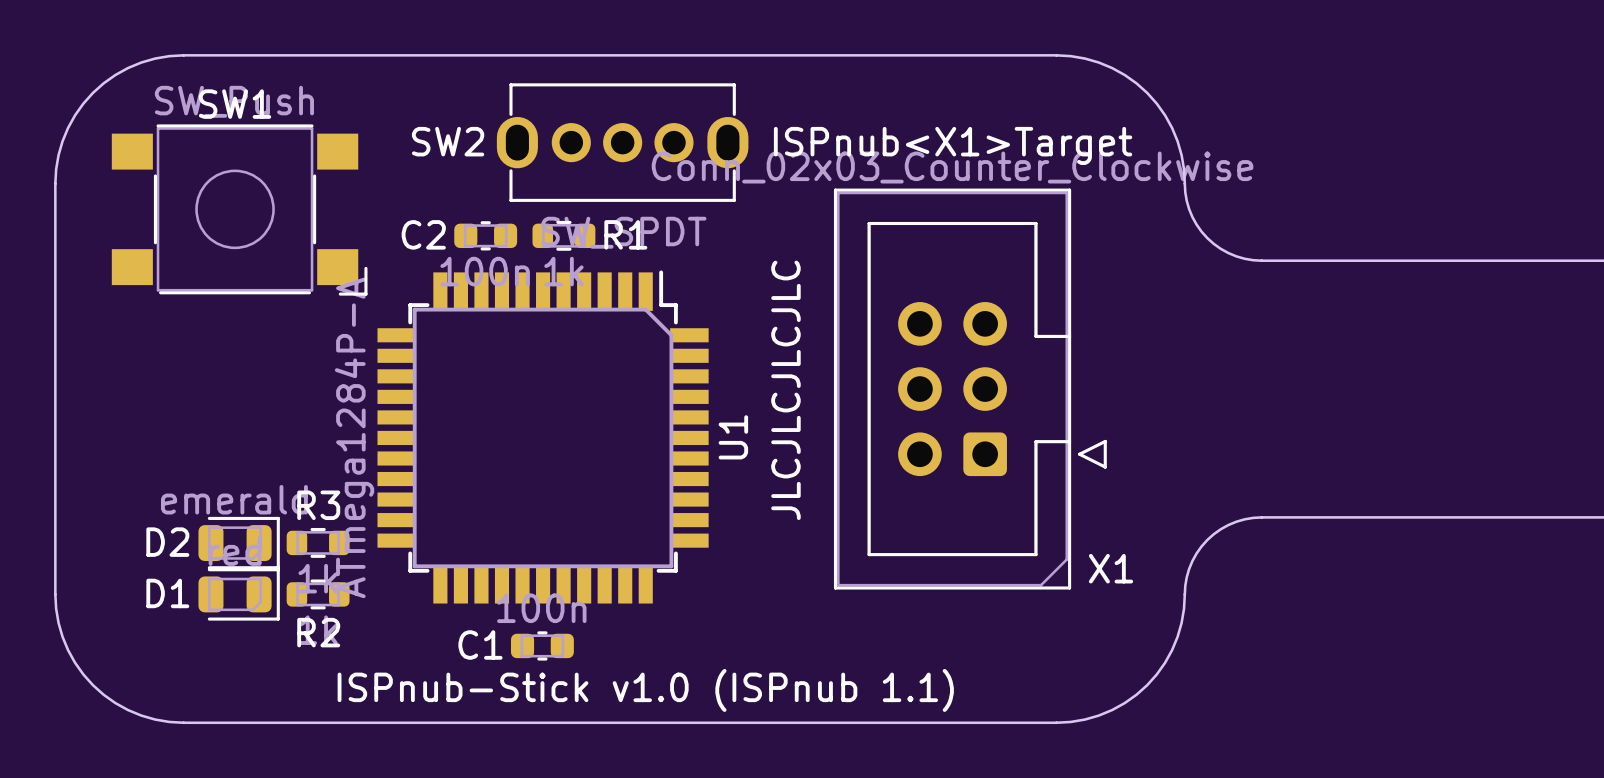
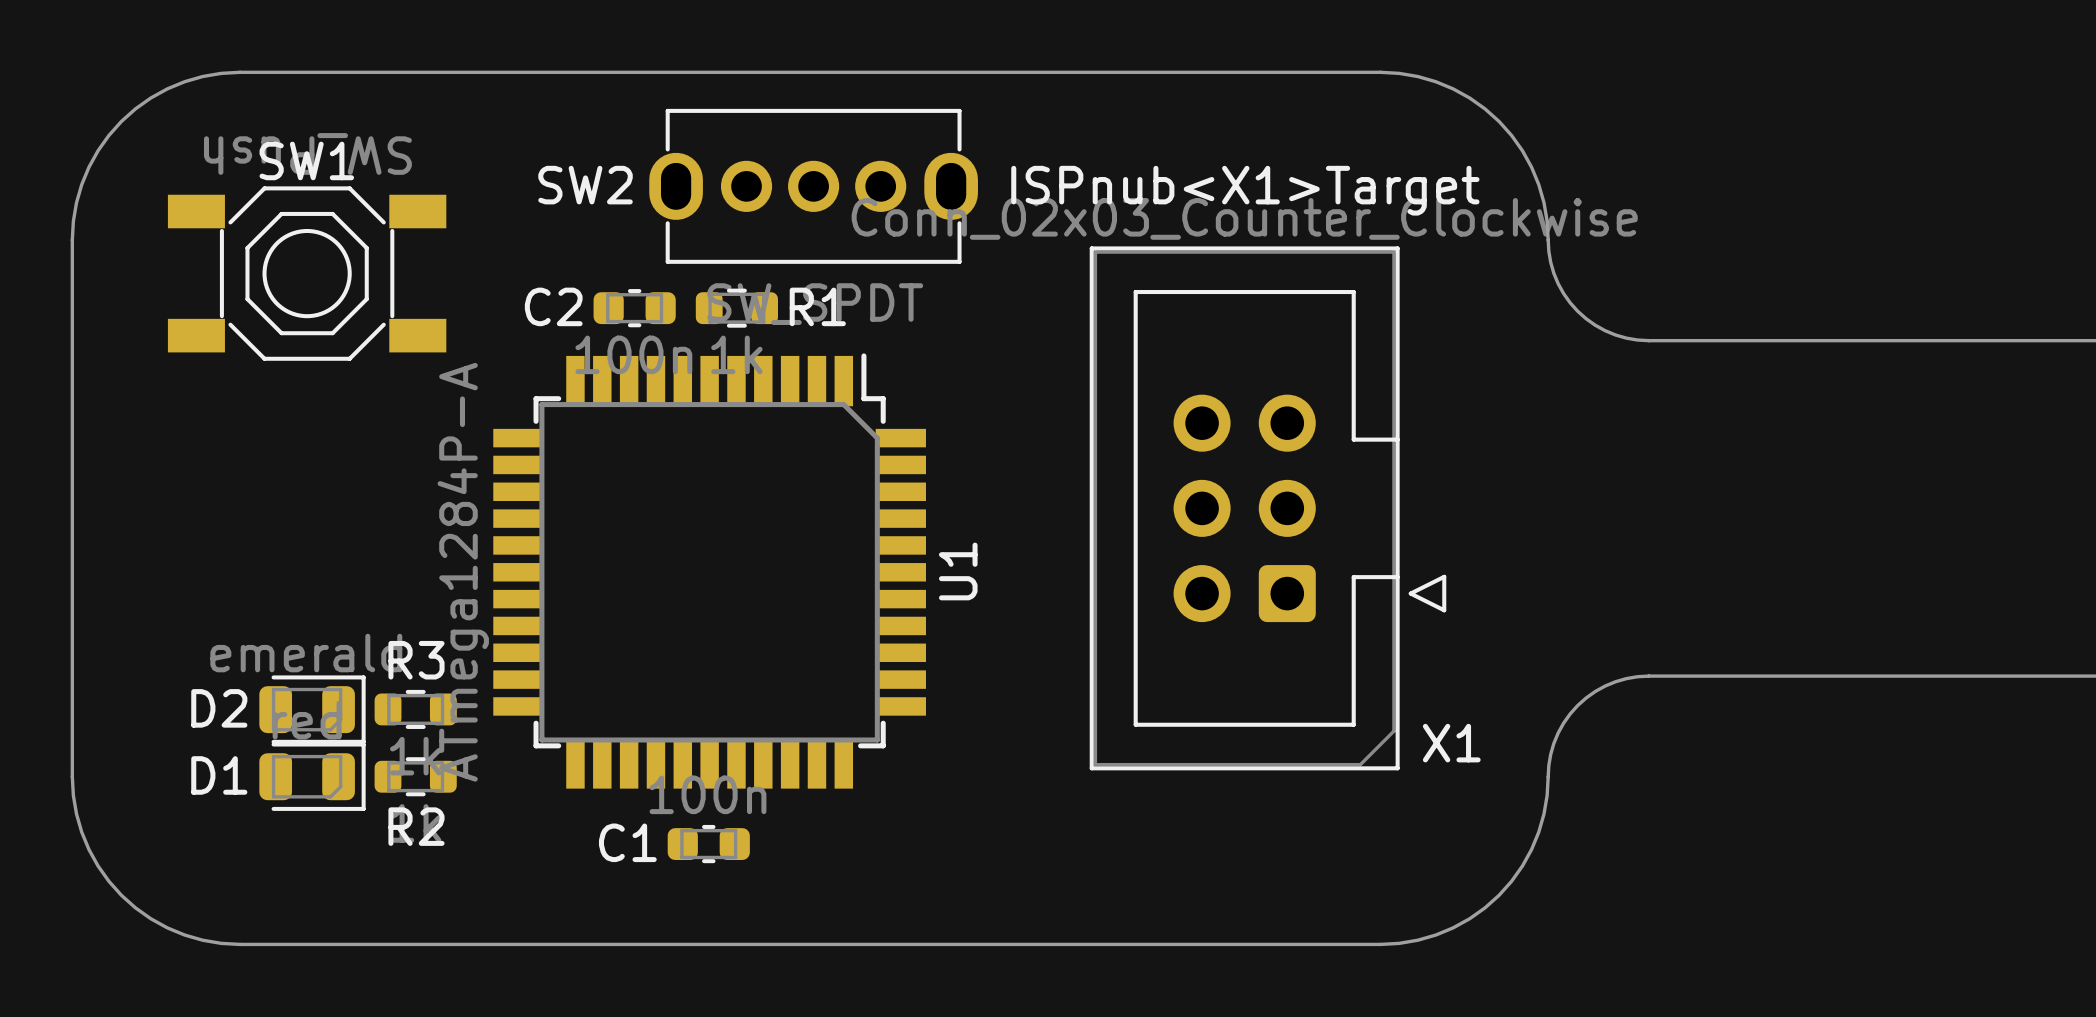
SW1 footprint: [111, 124, 368, 296] -> [167, 186, 447, 361]
text: JLCJLCJLCJLC (785, 390) -> none
text: ISPnub-Stick v1.0 (ISPnub 1.1) (645, 690) -> none

